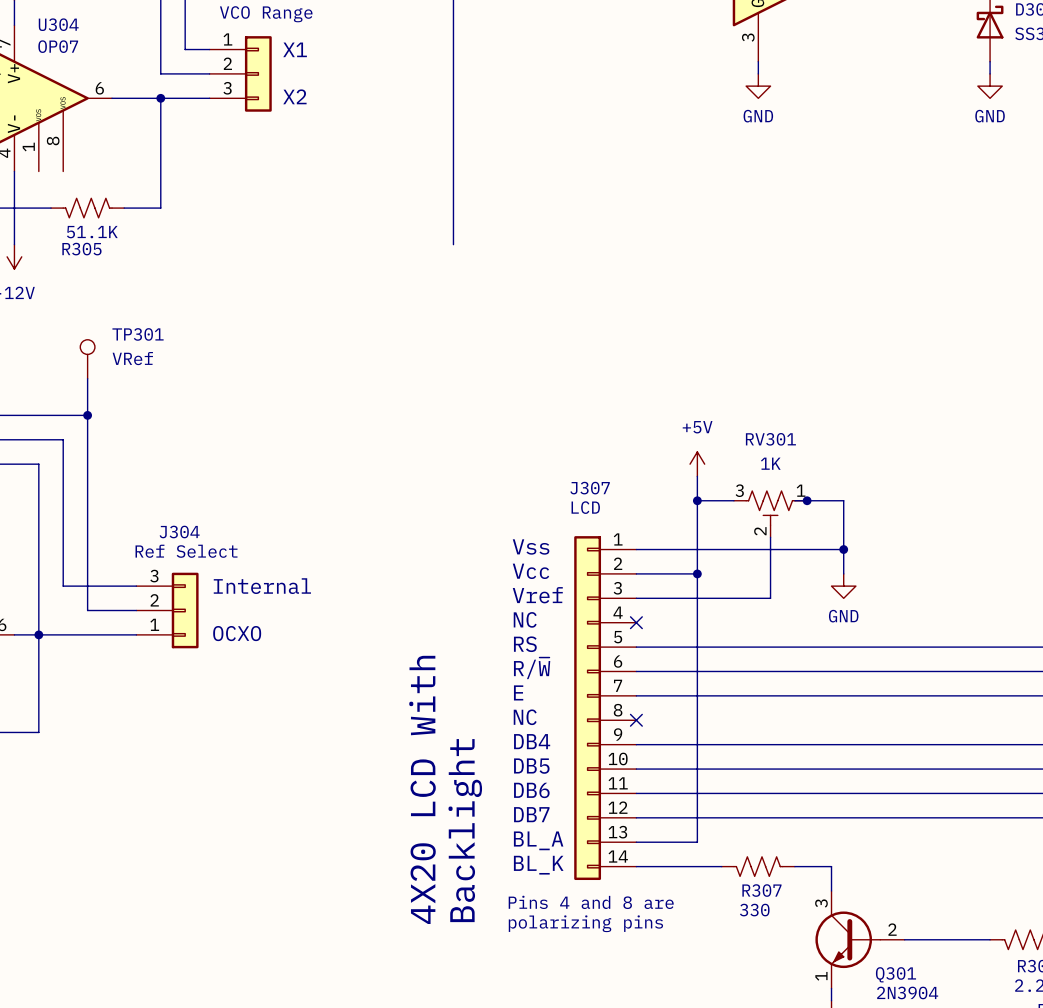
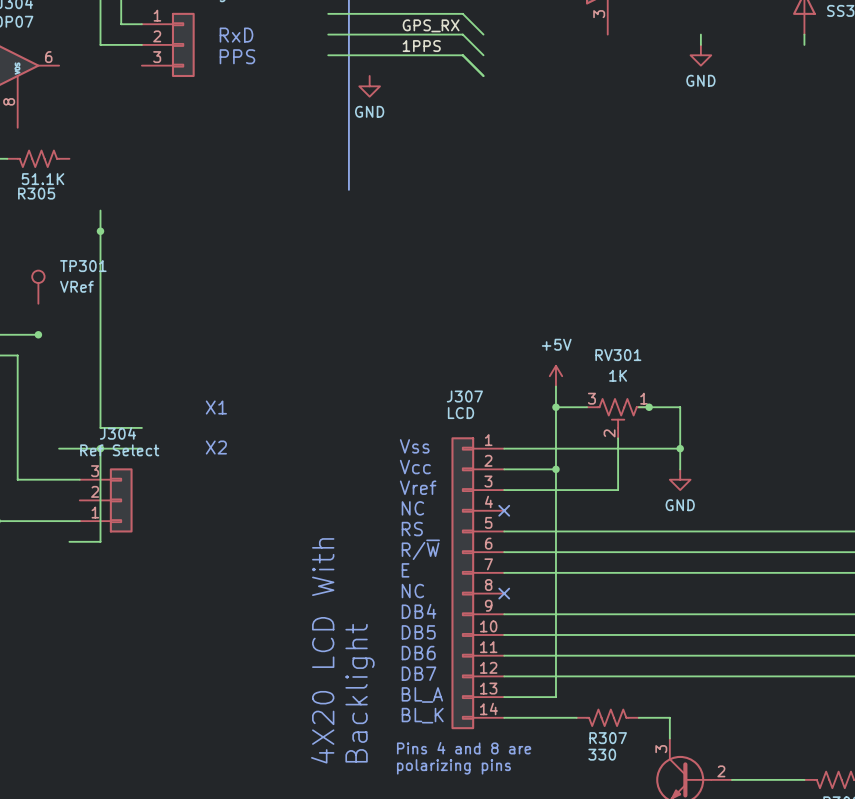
wire: none -> (328, 13) (462, 13) (483, 34)
text: X1 (295, 49) -> none
label: none -> GPS_RX (431, 25)
wire: none -> (328, 34) (462, 34) (483, 55)
wire: (758, 61) (758, 73) -> (700, 34) (700, 44)
text: none -> RxD (236, 35)
label: none -> 1PPS (421, 46)
wire: none -> (328, 55) (462, 55) (483, 75)
power symbol: GND (758, 86) -> none
power symbol: none -> GND (700, 55)
power symbol: GND (990, 86) -> none
text: none -> PPS (237, 56)
text: X2 (294, 96) -> none
wire: (112, 98) (209, 98) -> none
wire: (160, 98) (160, 208) (124, 208) -> none
junction: (160, 98) -> none
power symbol: none -> GND (369, 86)
wire: none -> (100, 210) (100, 427) (141, 427)
junction: none -> (100, 231)
wire: (87, 378) (87, 610) (136, 610) -> none
text: none -> X1 (216, 407)
text: none -> X2 (216, 447)
wire: none -> (59, 448) (141, 448)
wire: none -> (100, 448) (100, 541) (69, 541)
junction: none -> (100, 448)
text: Internal (262, 586) -> none
text: OCXO (237, 633) -> none

